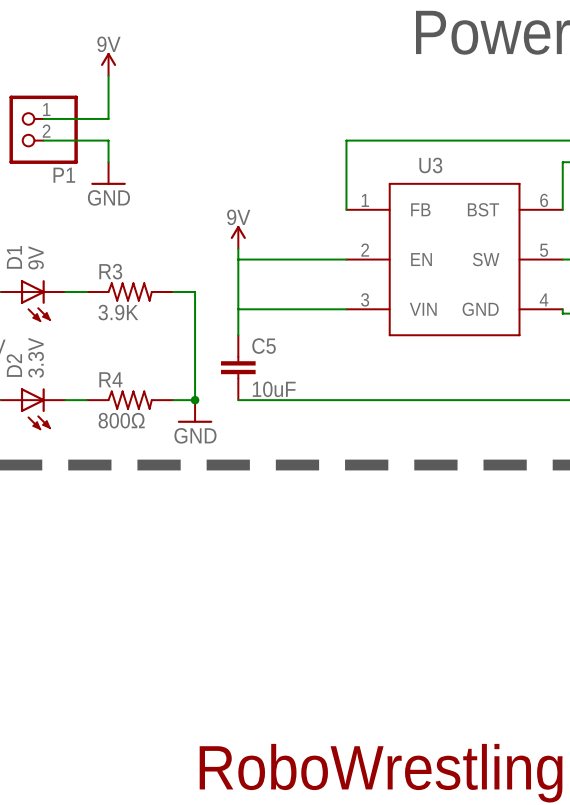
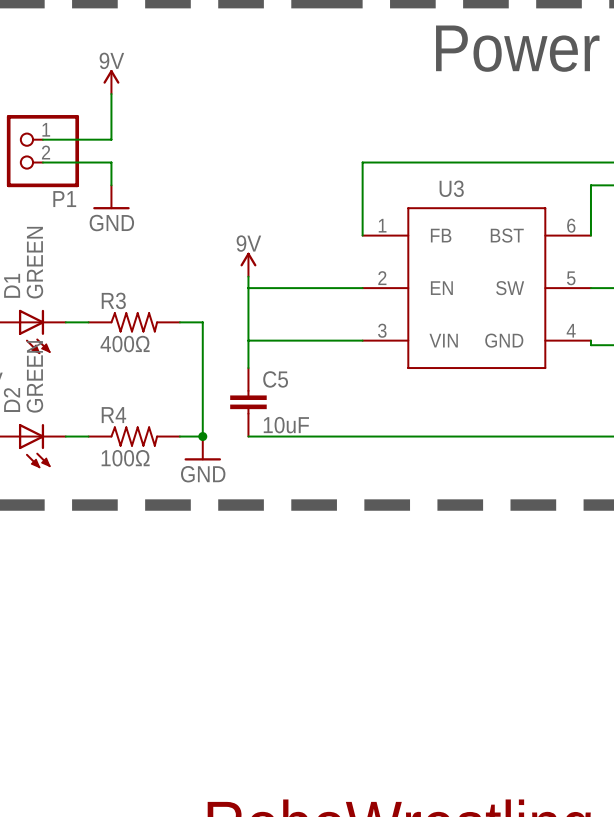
D1 value: 9V (36, 257) -> GREEN (34, 262)
R3 value: 3.9K (118, 312) -> 400Ω (125, 344)
D2 value: 3.3V (36, 357) -> GREEN (34, 376)
R4 value: 800Ω (121, 420) -> 100Ω (125, 458)

